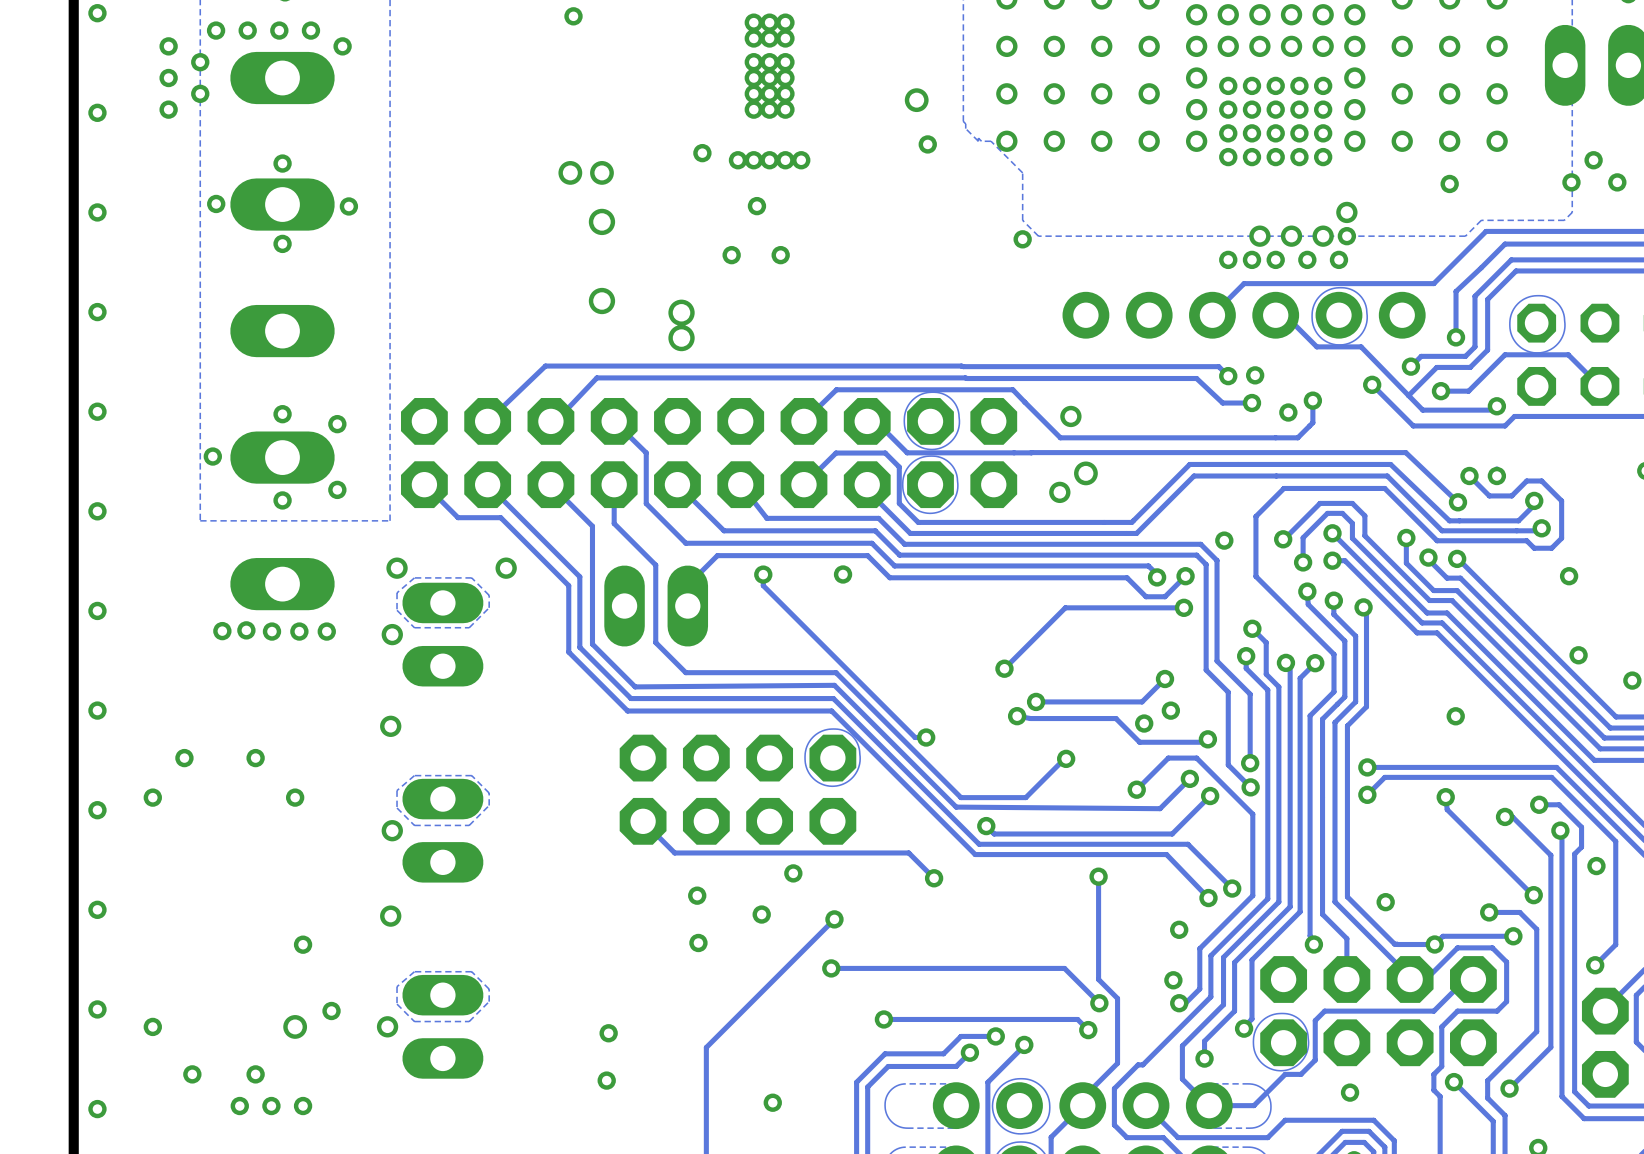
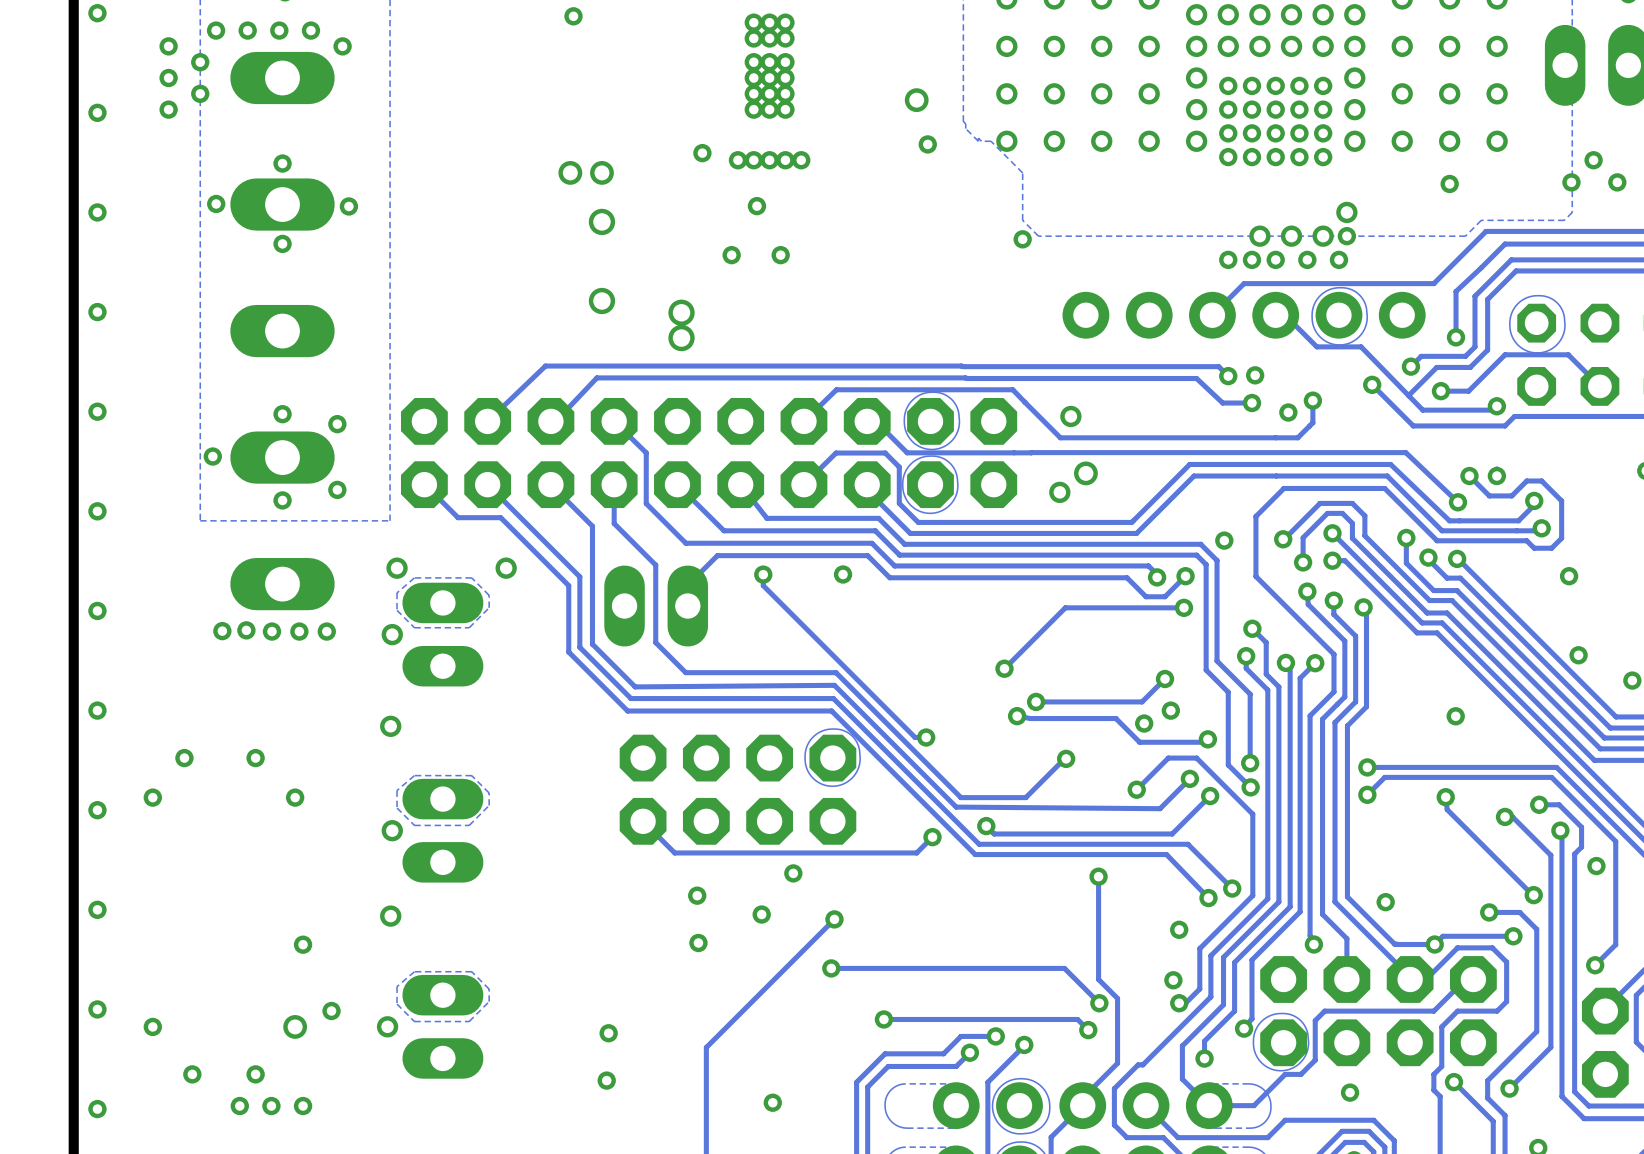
track: (908, 852) (934, 878) -> (908, 852) (916, 852) (932, 837)
via position: (934, 878) -> (932, 837)

